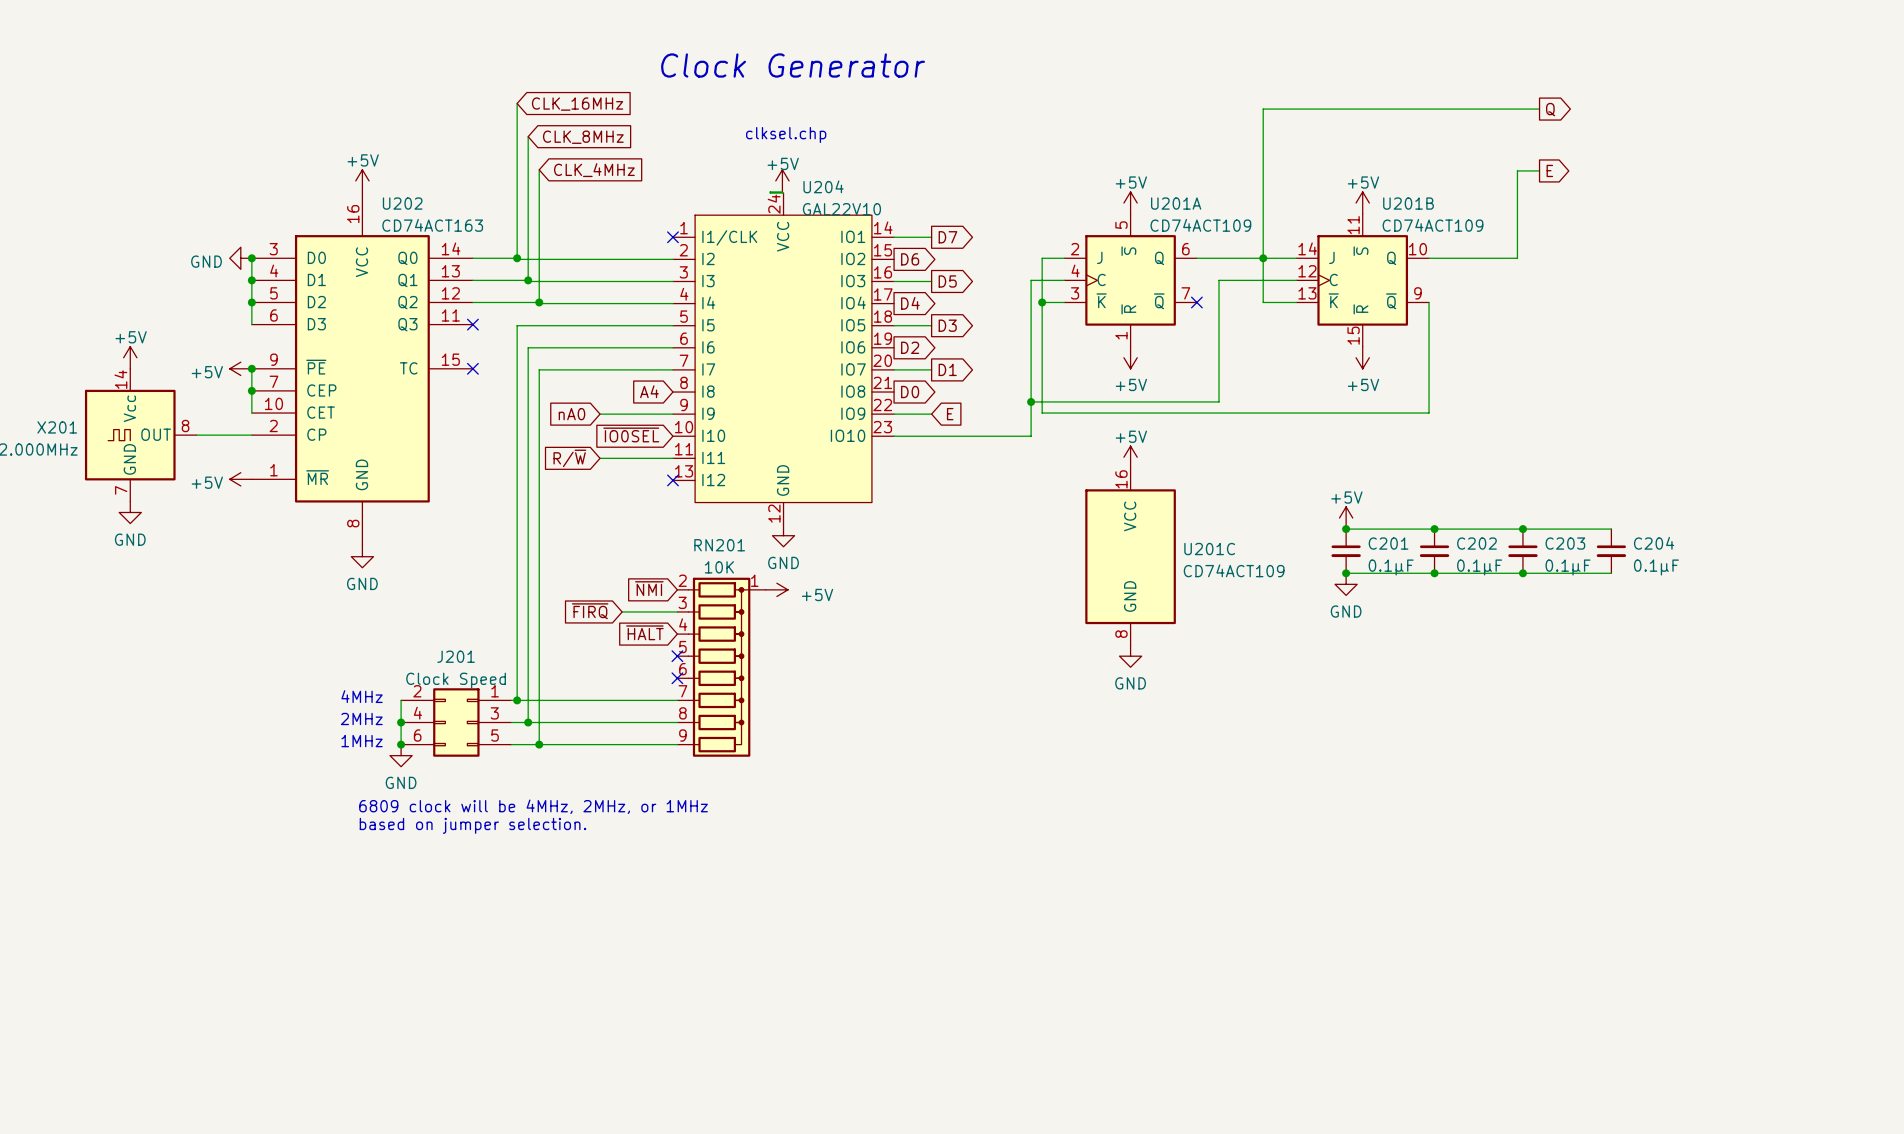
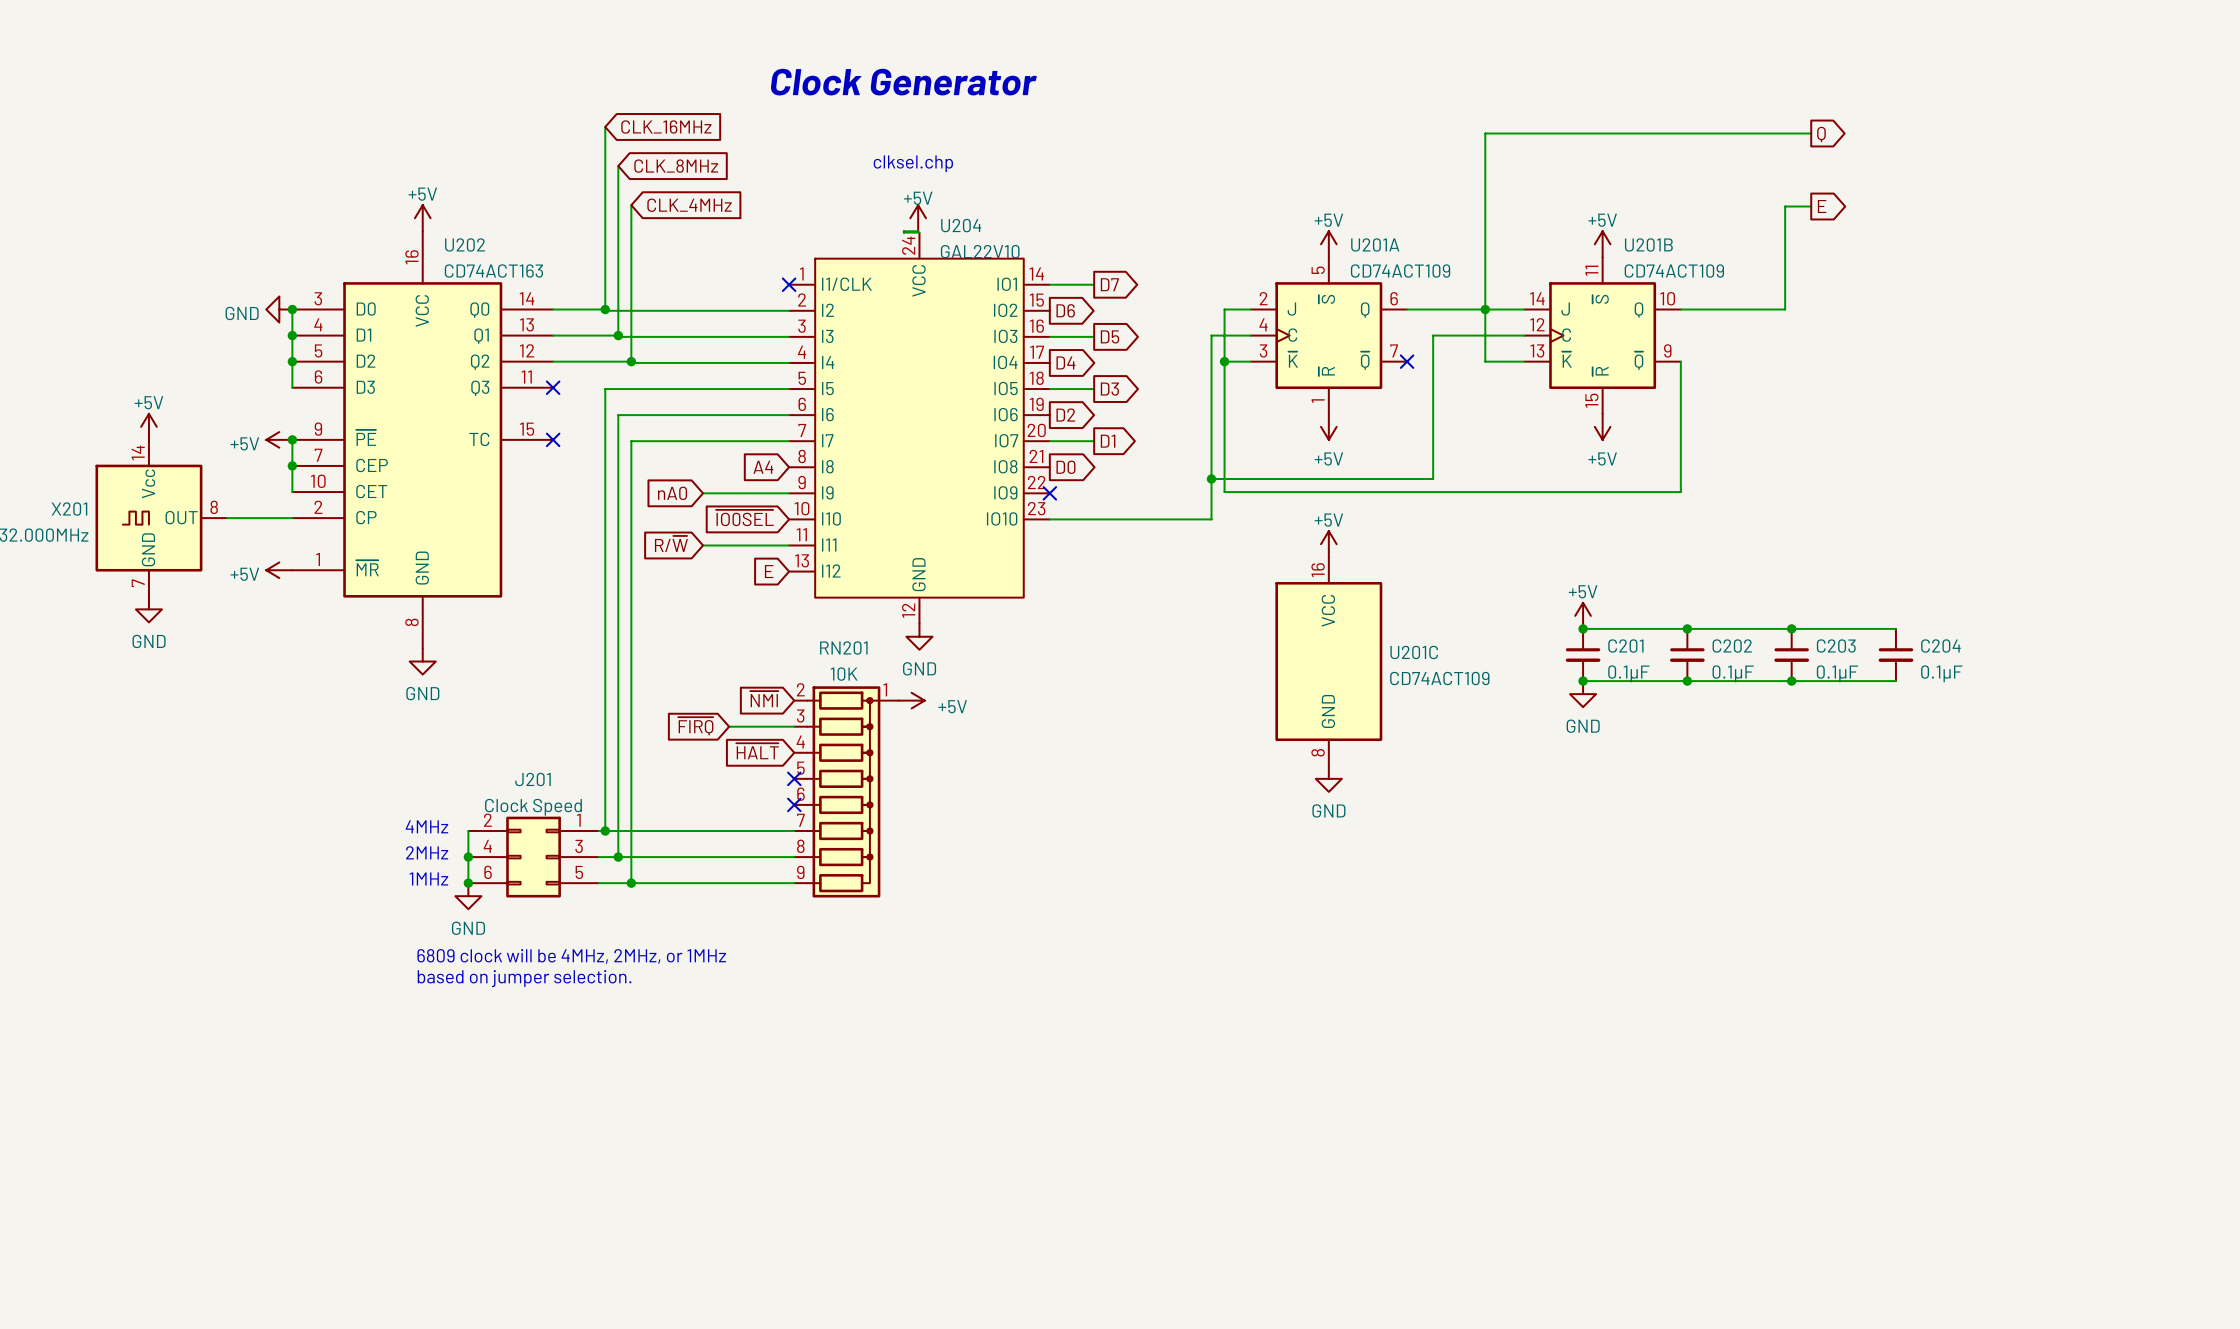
wire: (894, 414) (931, 414) -> none
no-connect mark: none -> (1049, 493)
global label: E (950, 414) -> none
global label: none -> E (769, 571)
no-connect mark: (672, 480) -> none

